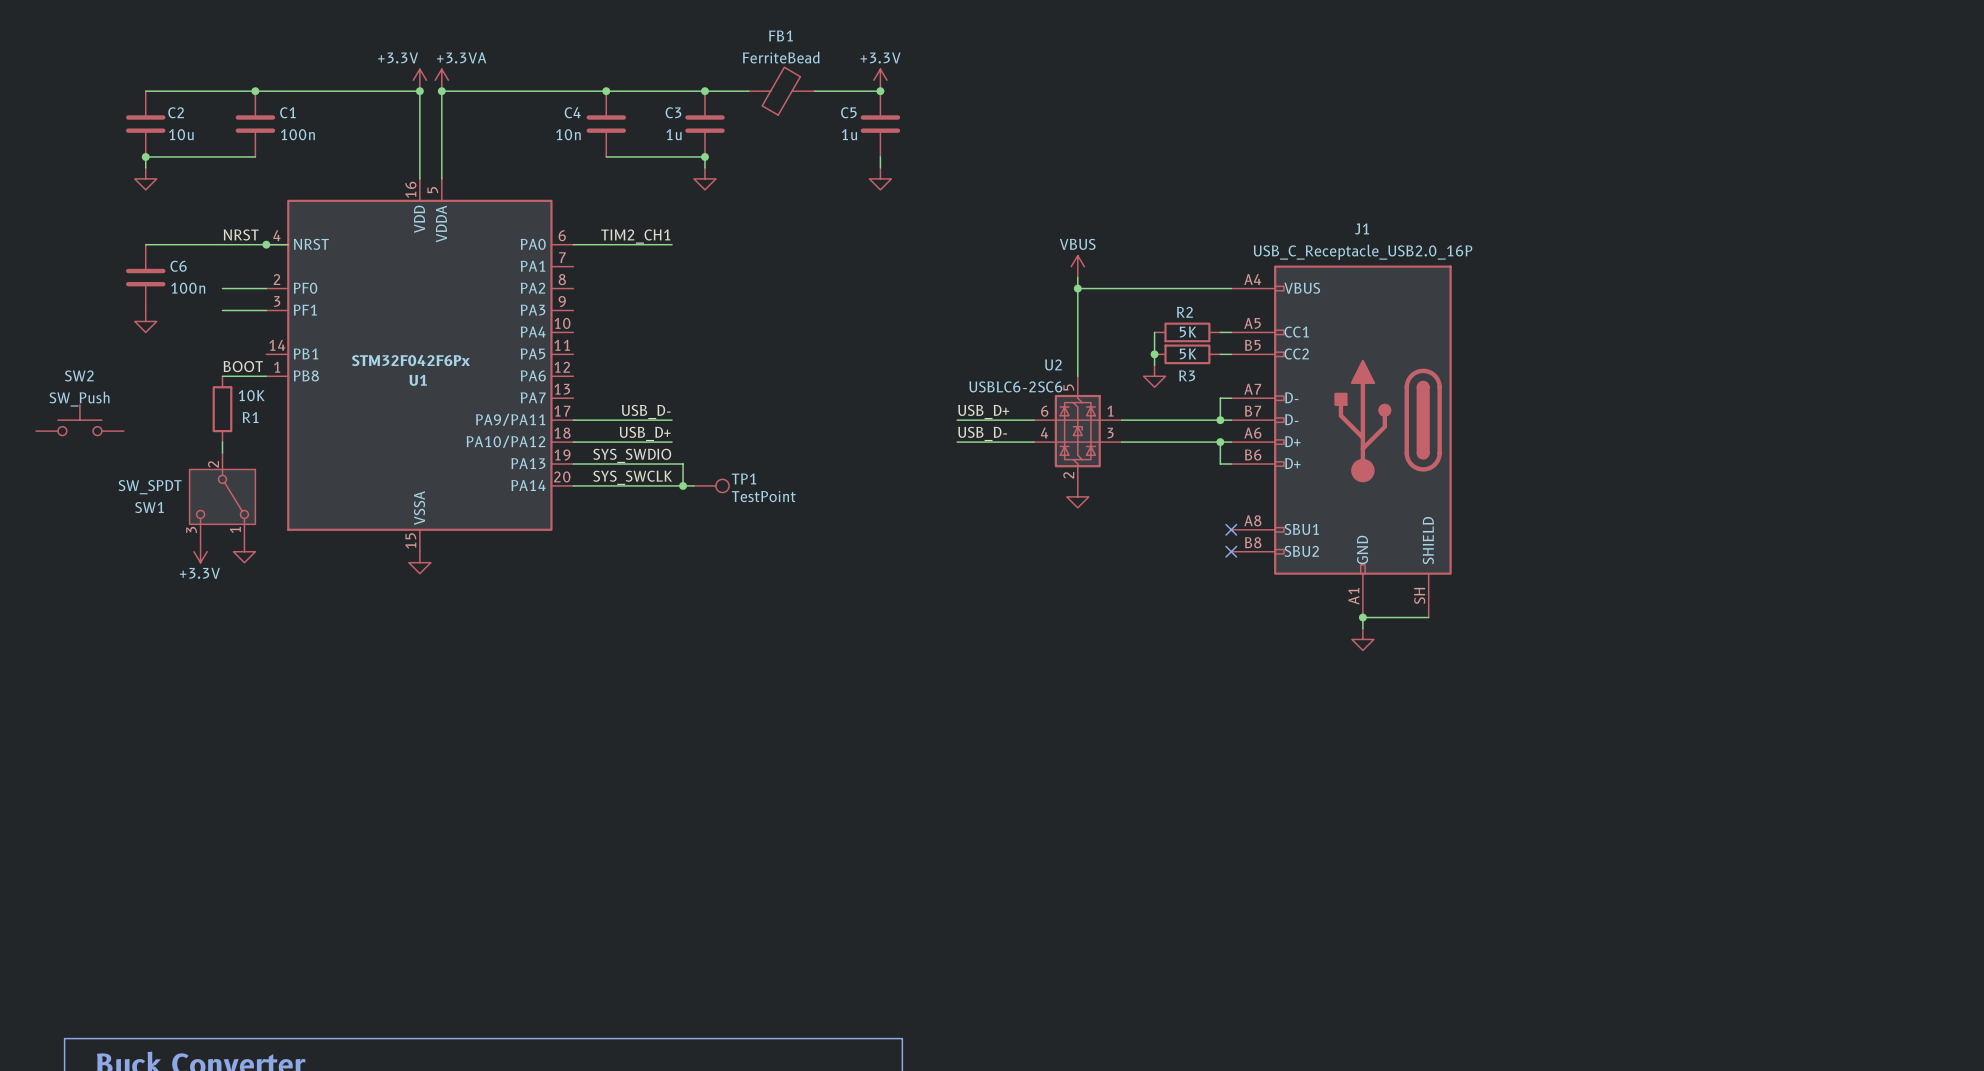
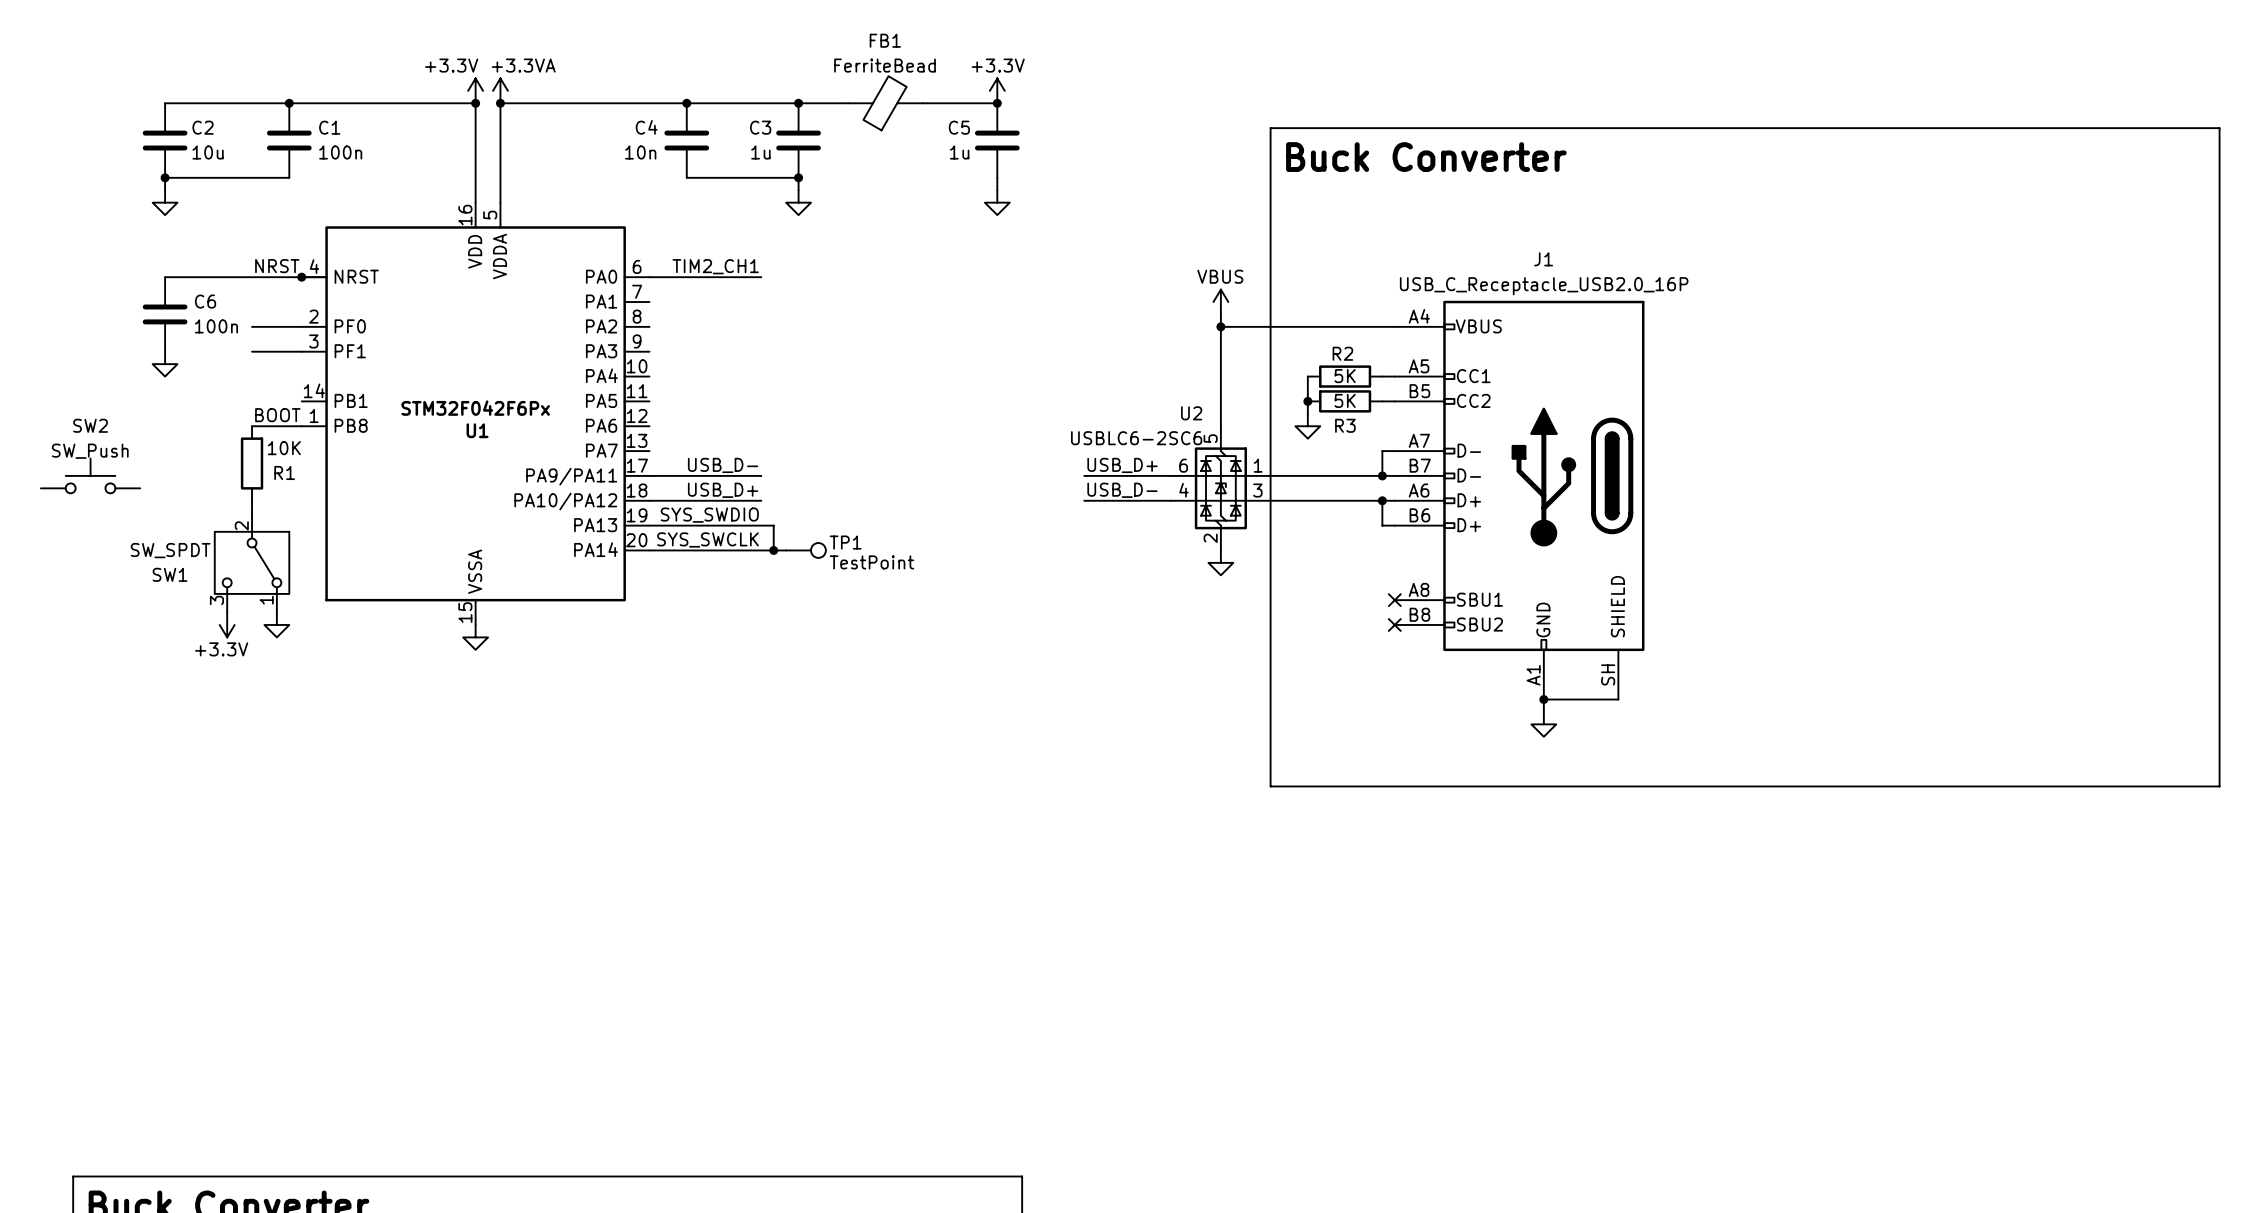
line: none -> (1270, 128) (2219, 128) (2219, 786) (1270, 786) (1270, 128)
text: none -> Buck Converter (1426, 157)

